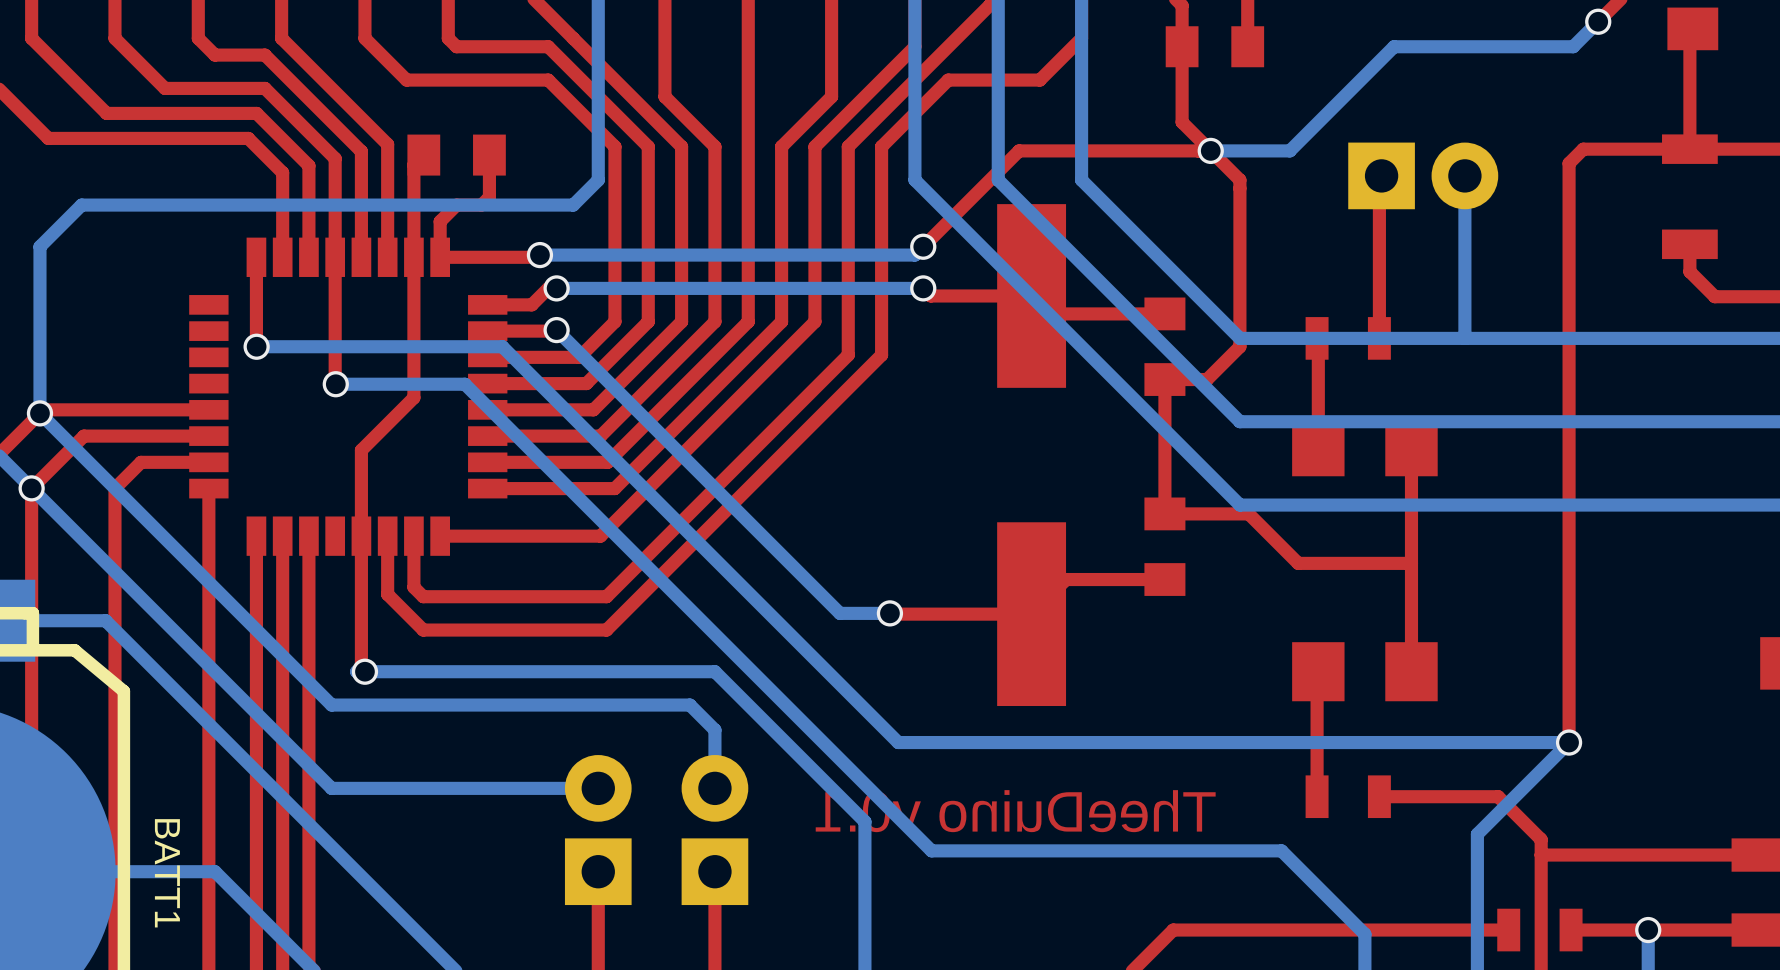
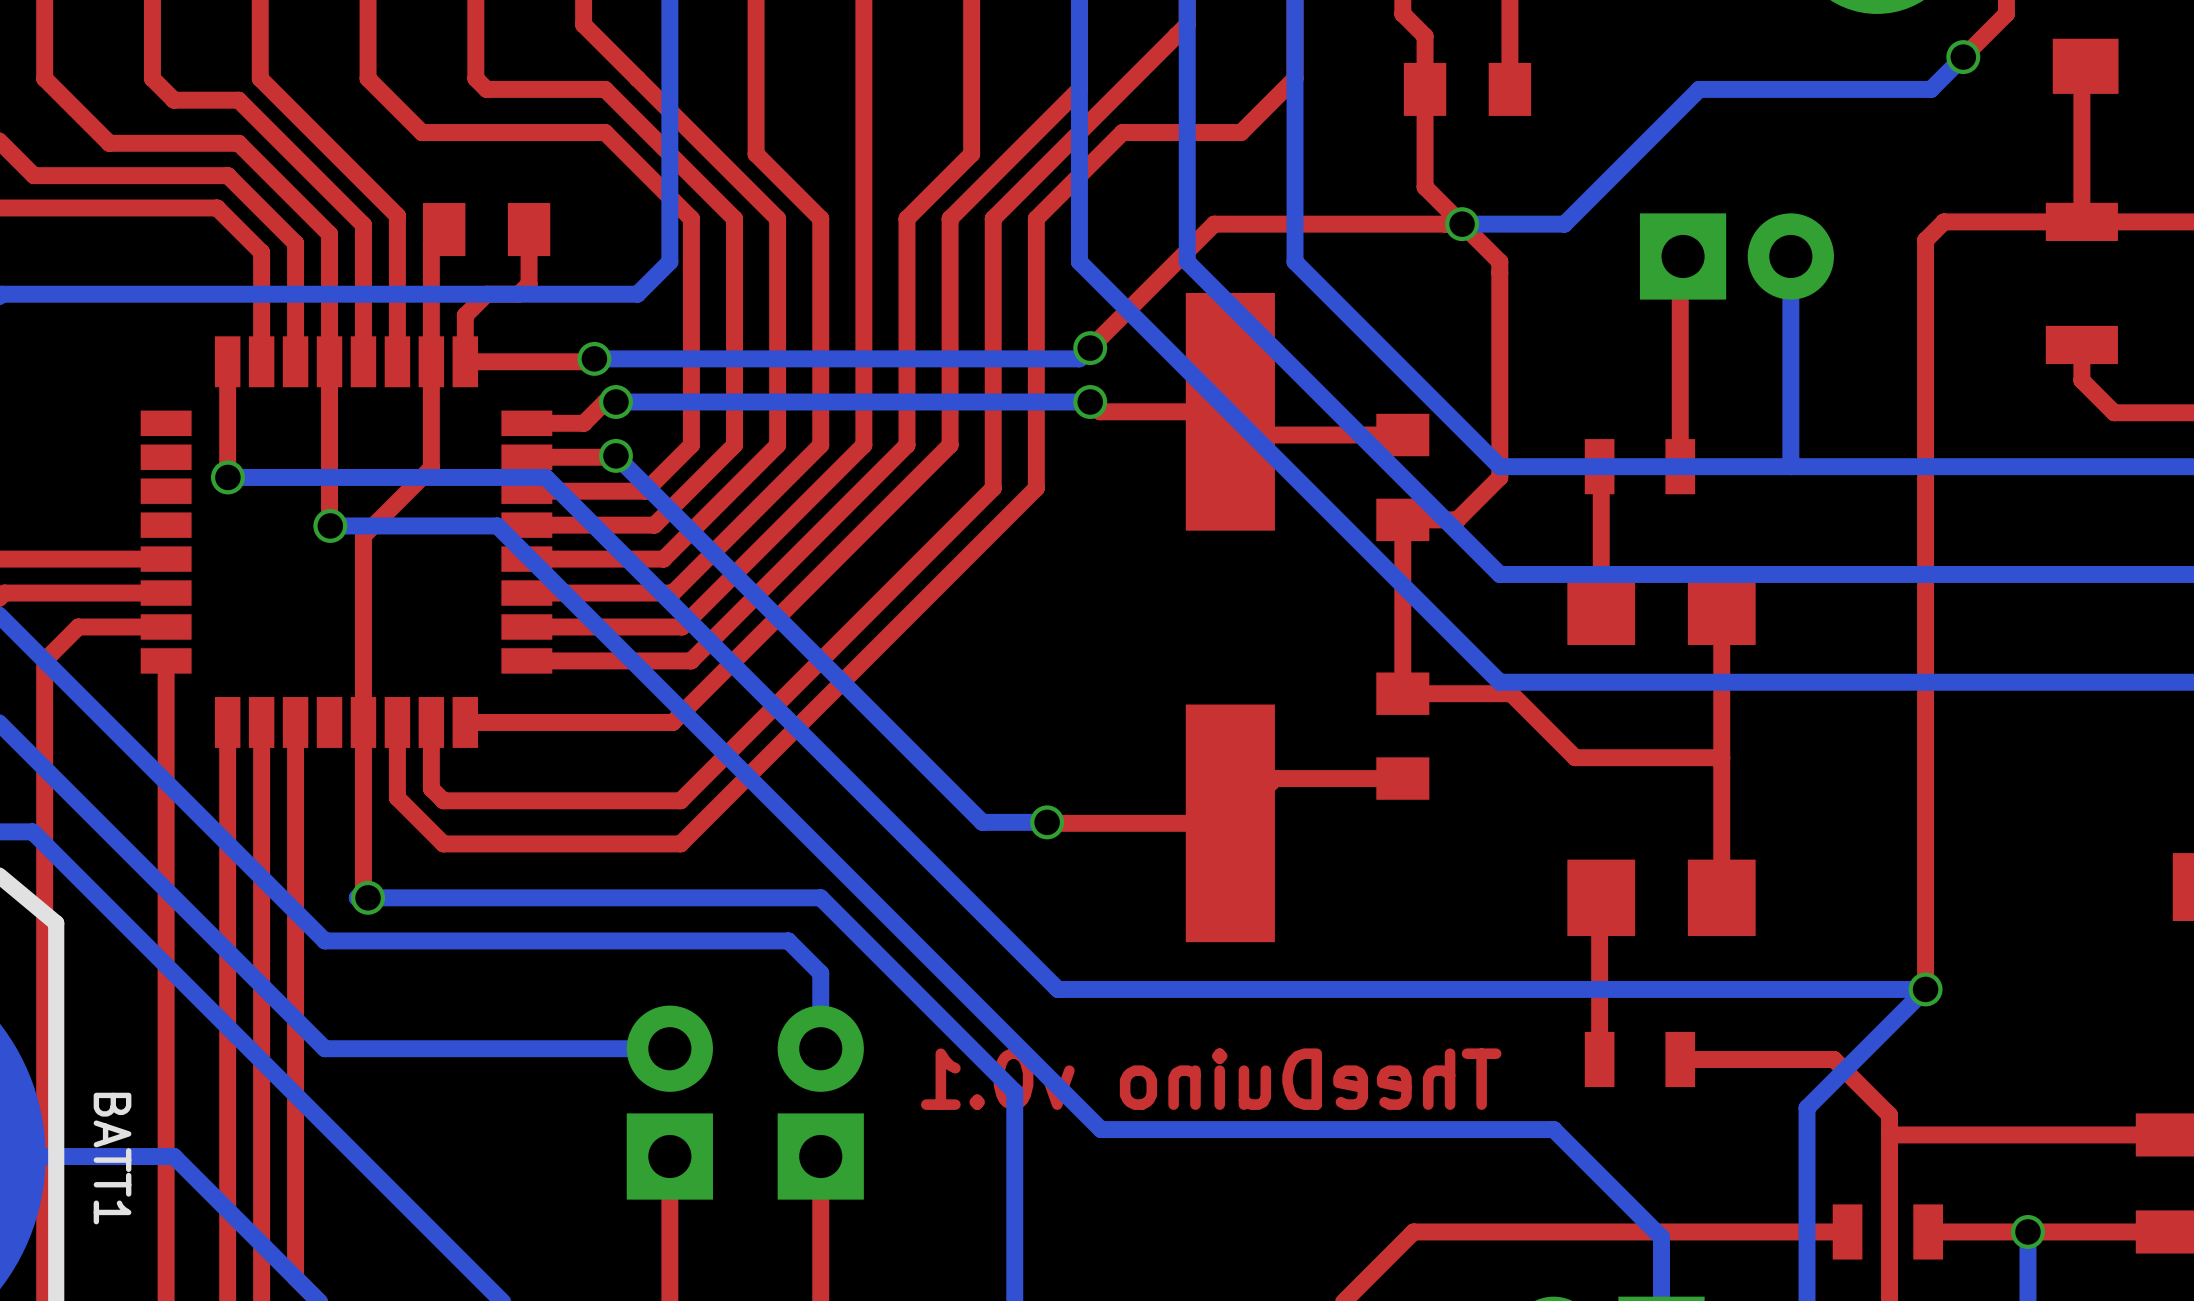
top track: (413, 339) (413, 397) (361, 450) -> (431, 468) (363, 535) (363, 611)

